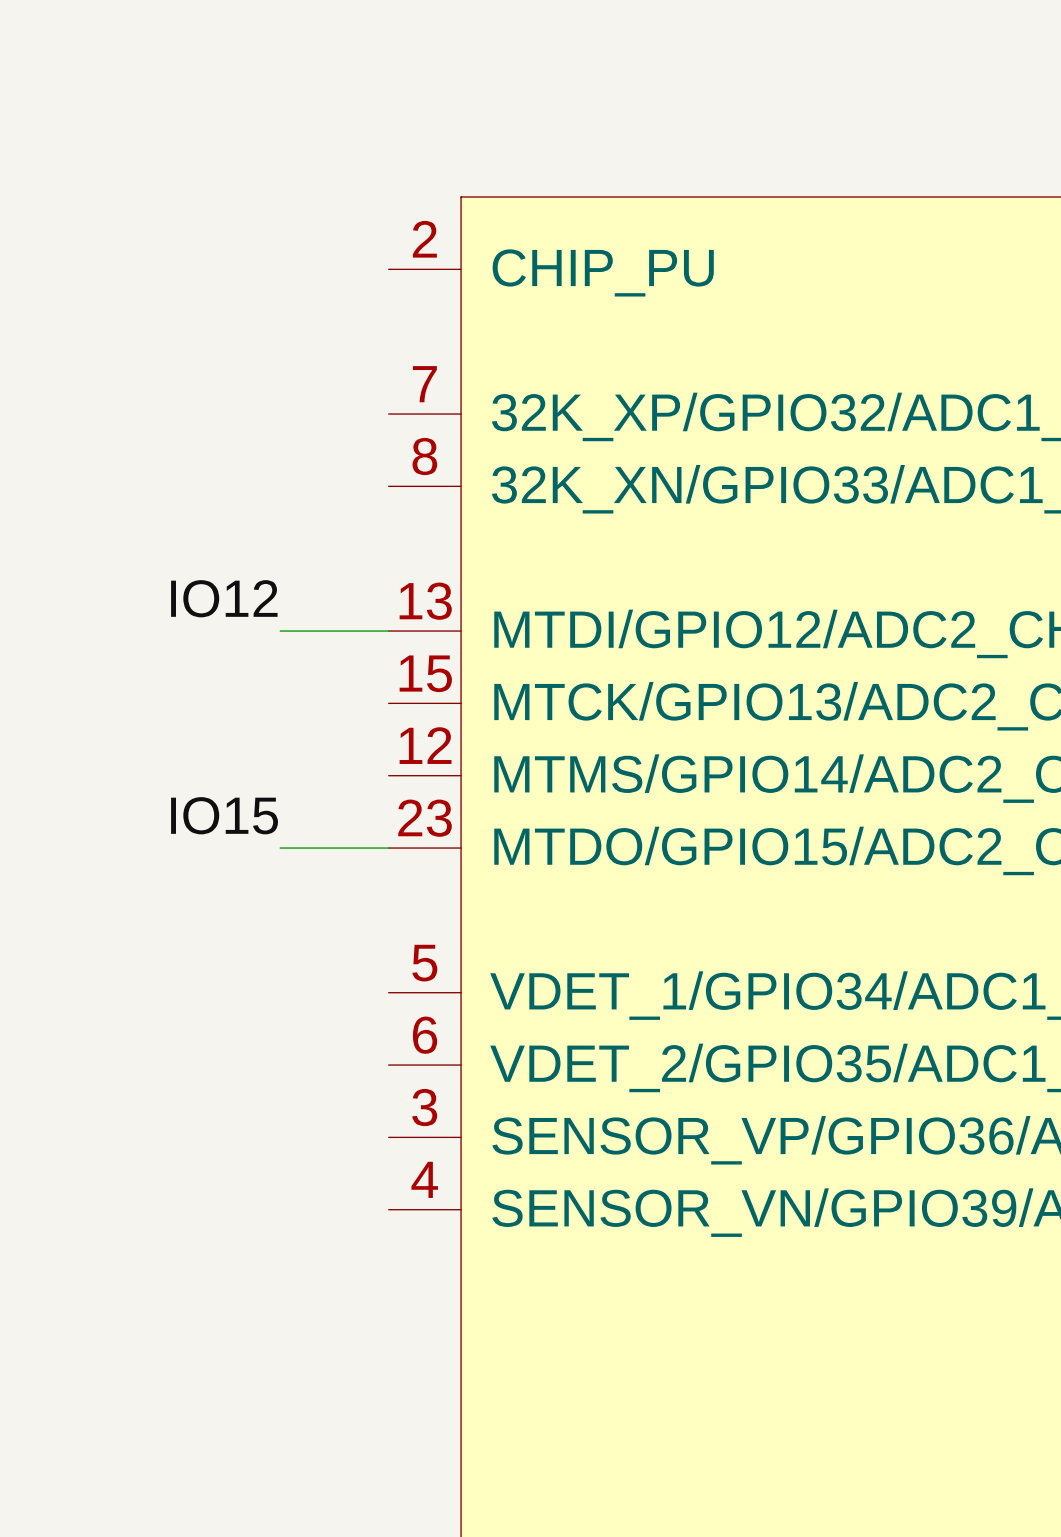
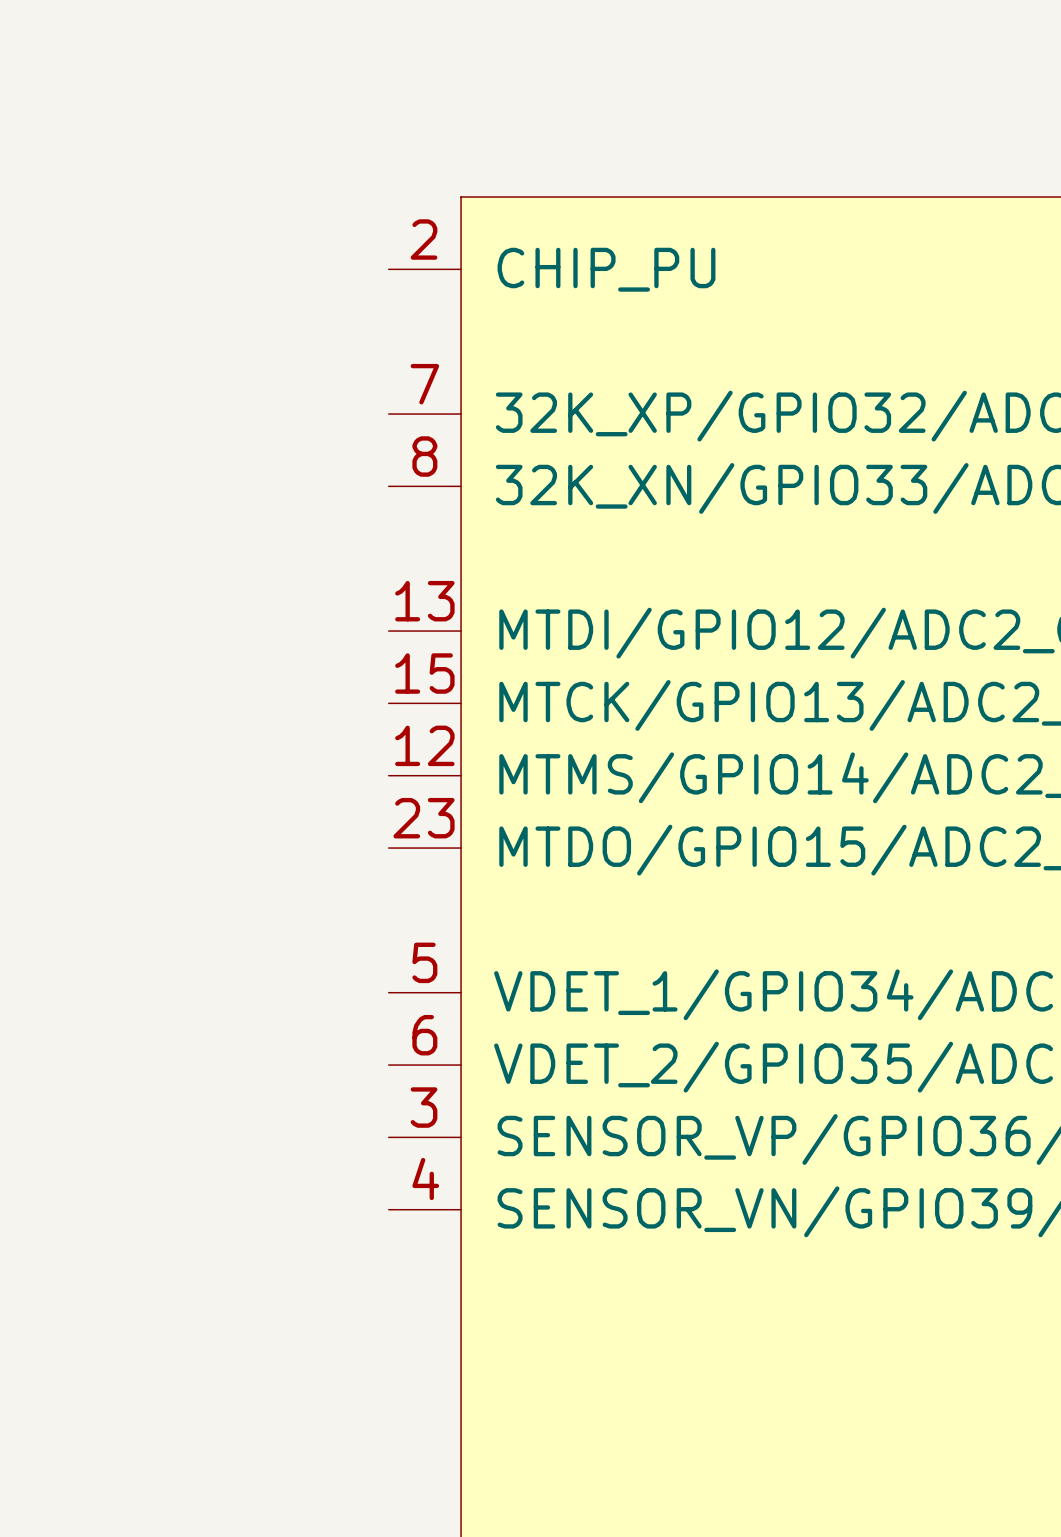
label: IO12 (224, 598) -> none
wire: (280, 631) (388, 631) -> none
label: IO15 (224, 815) -> none
wire: (280, 848) (388, 848) -> none

